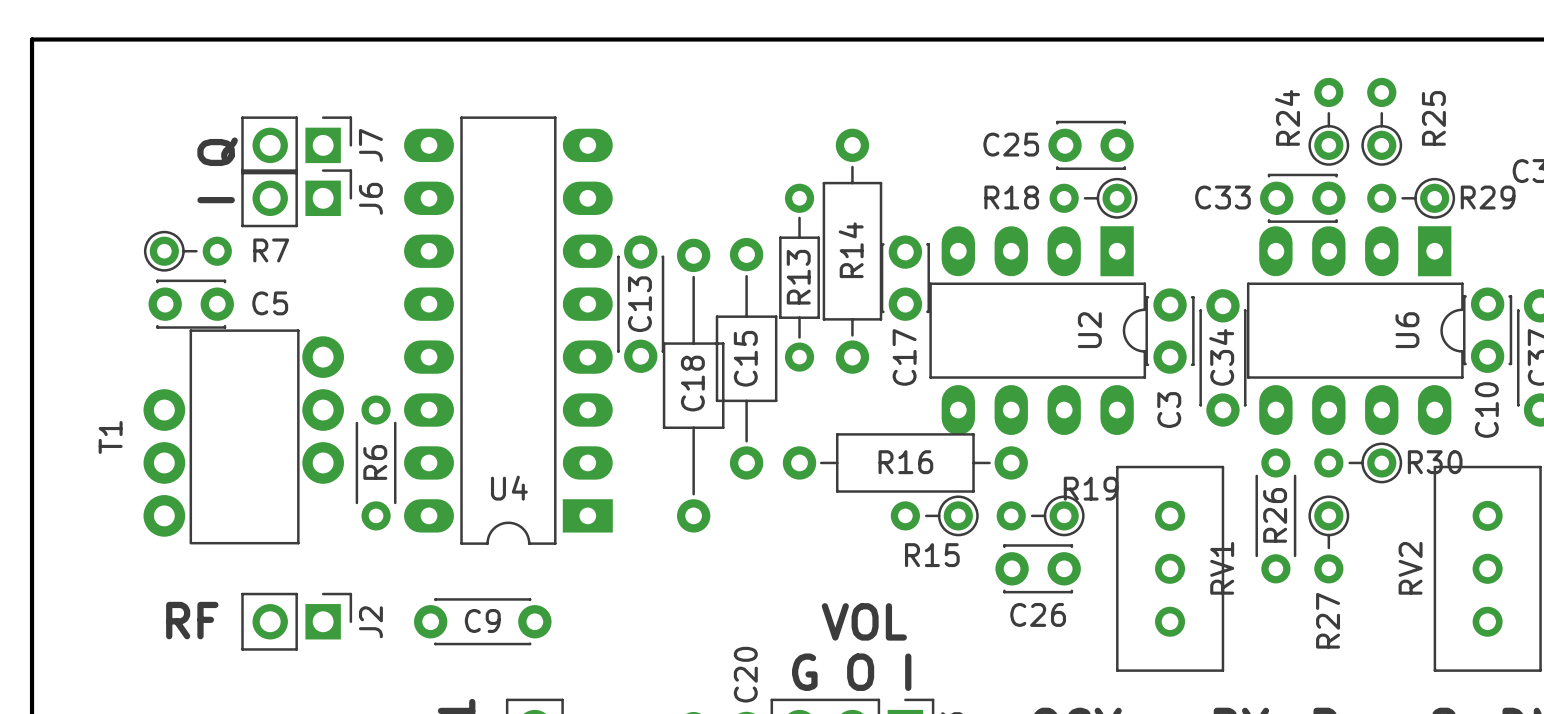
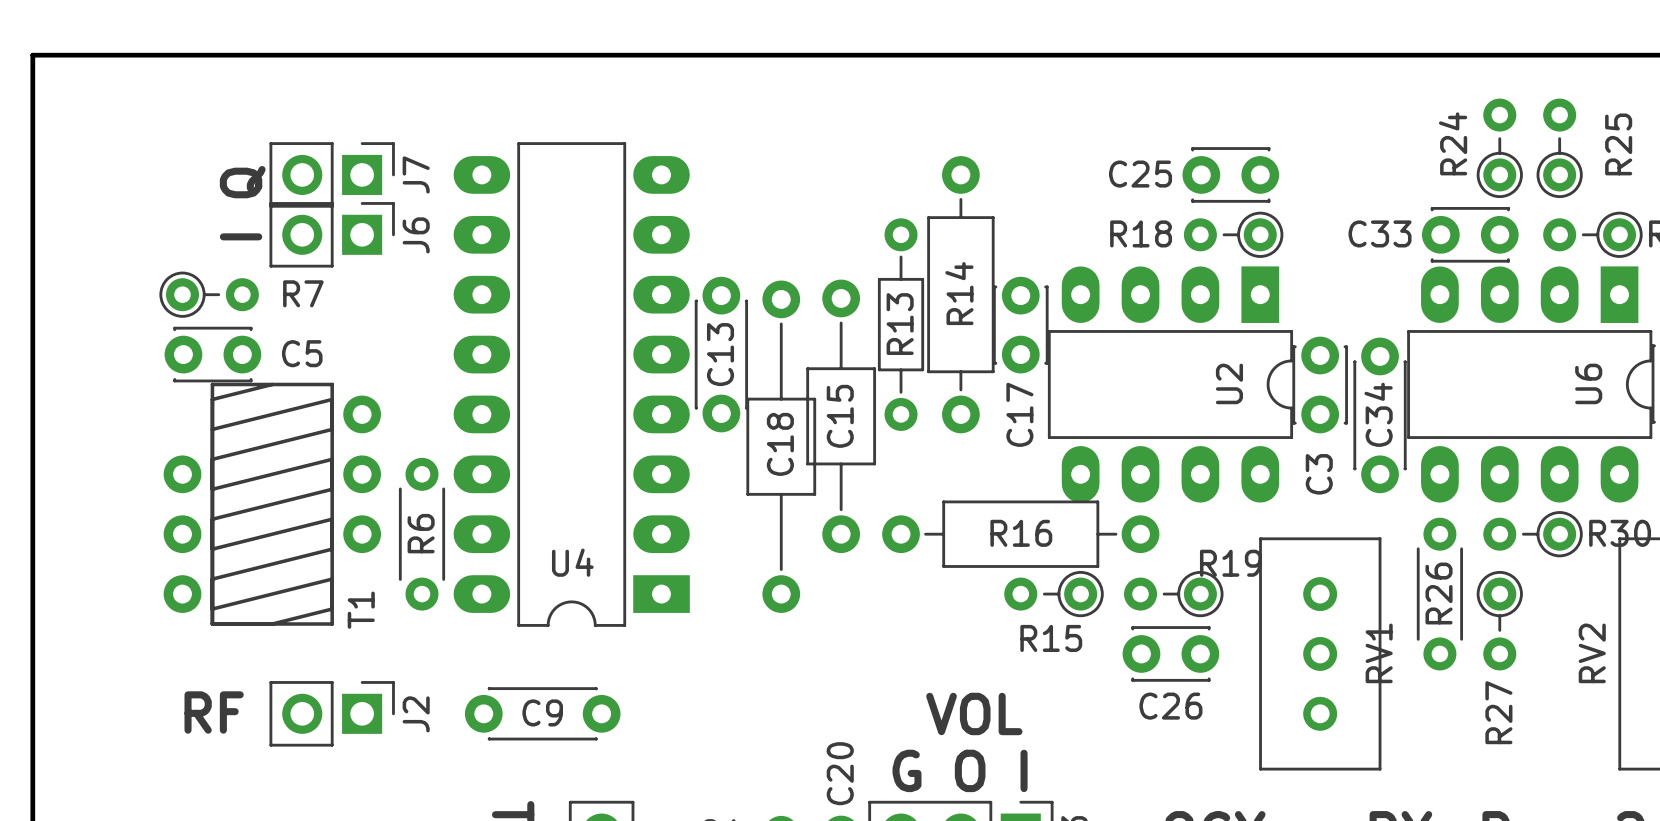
T1 footprint: [143, 329, 344, 545] -> [163, 382, 381, 626]
T1 name position: T1 (110, 437) -> T1 (361, 610)

